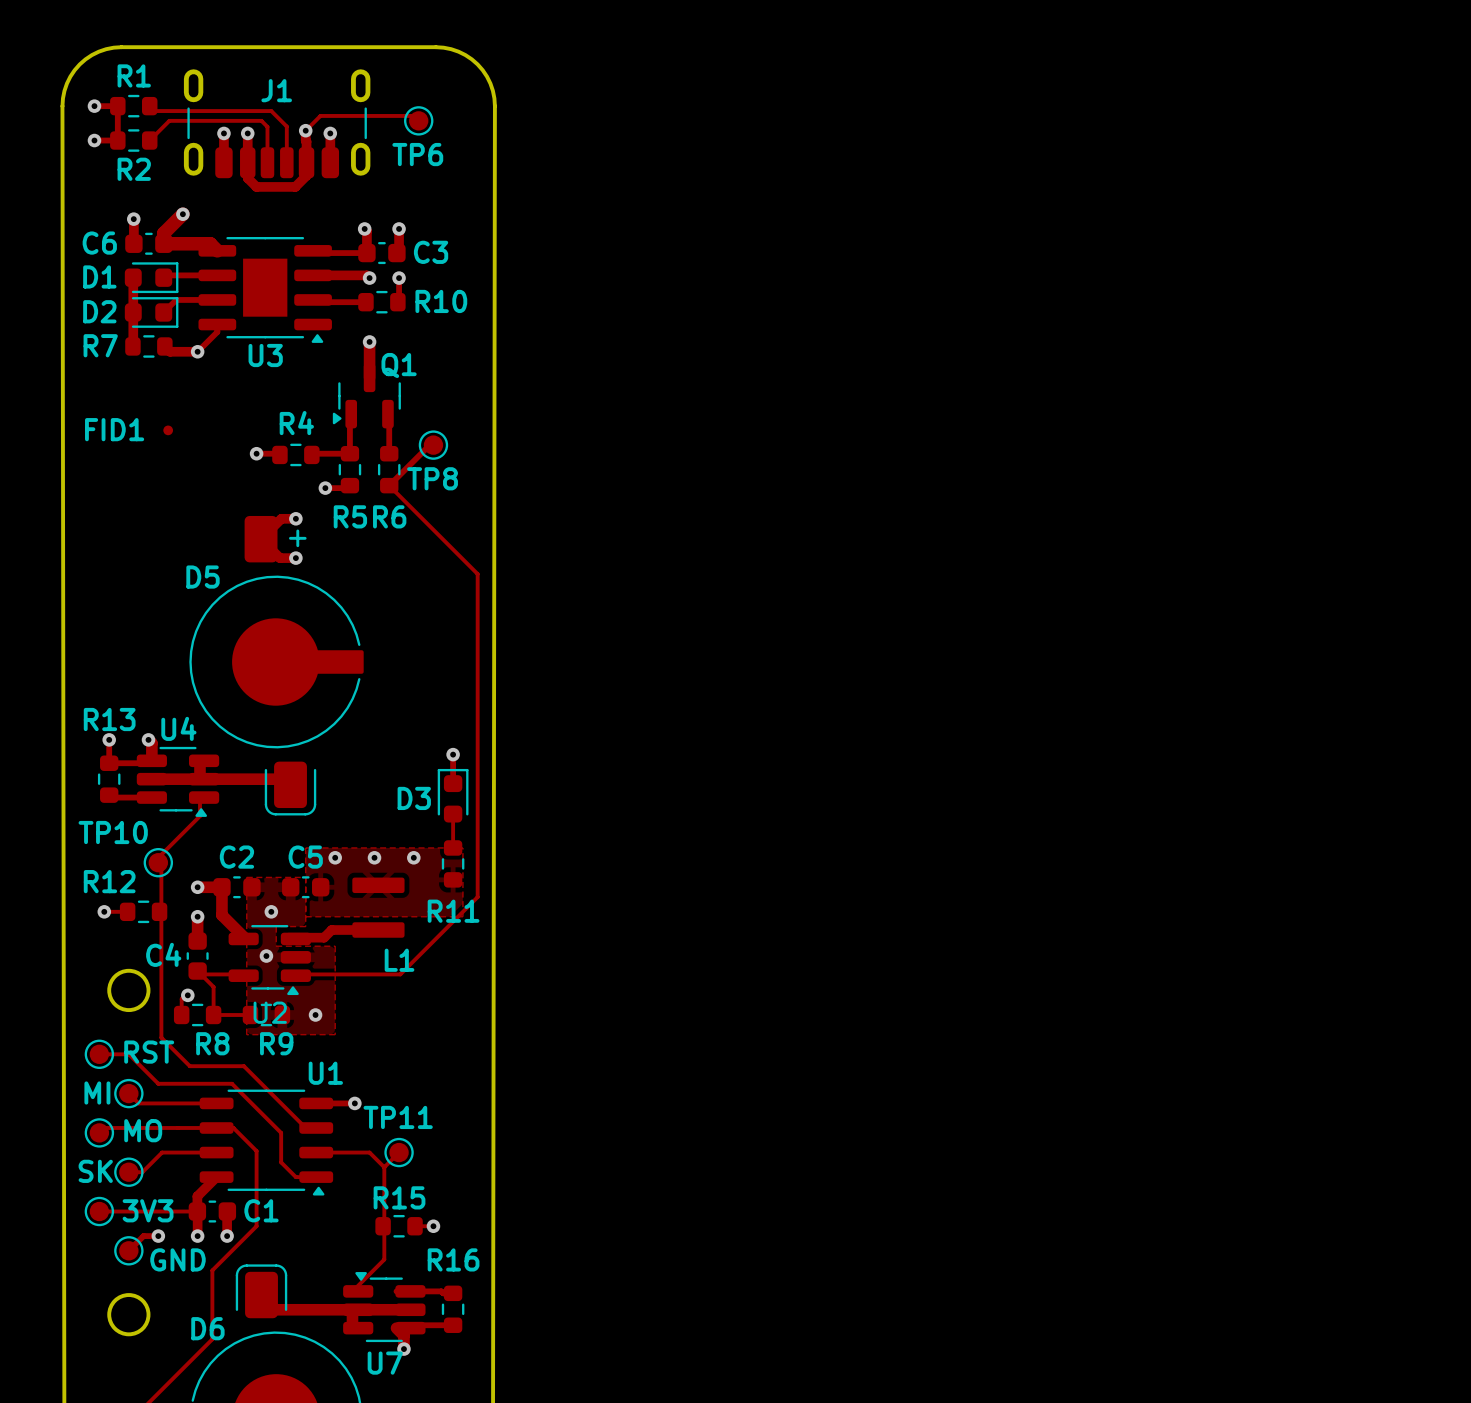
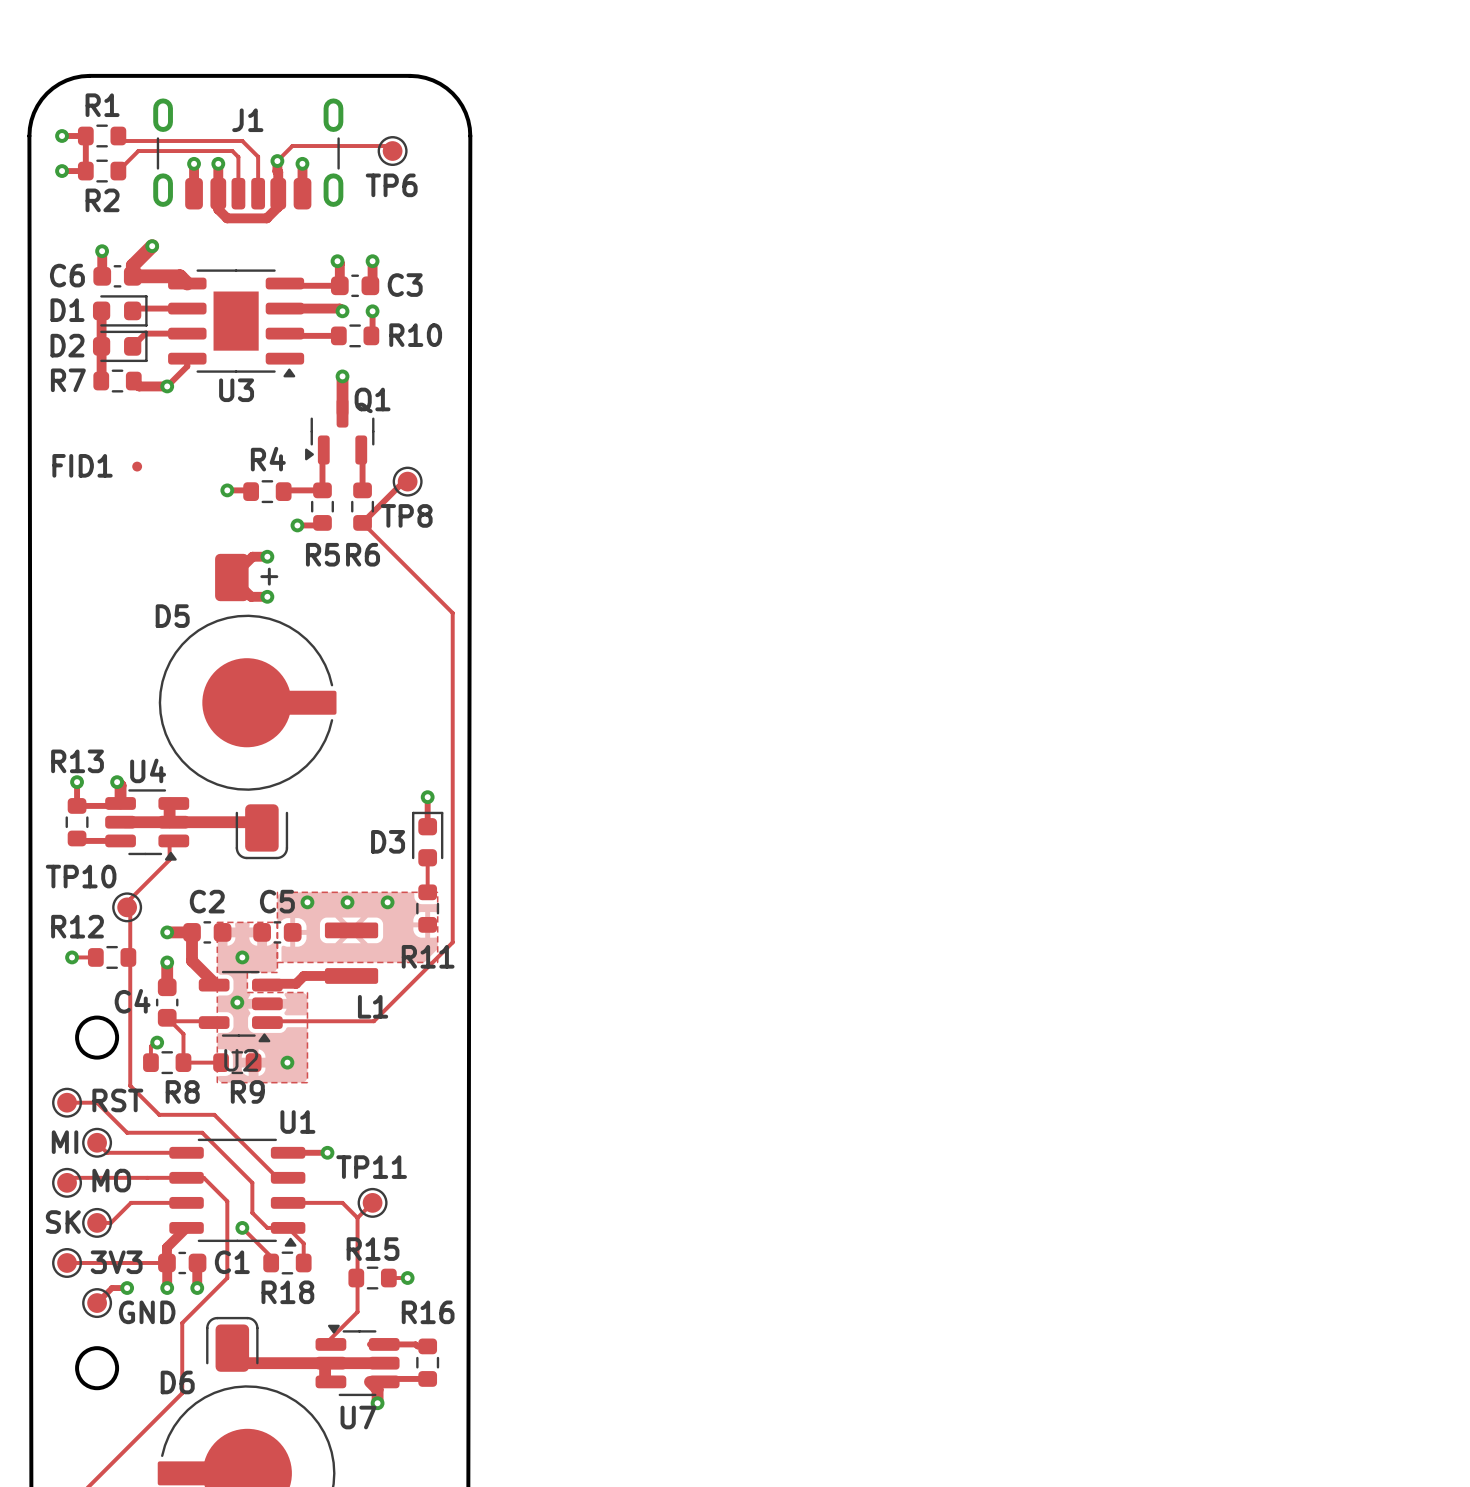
track: none -> (242, 1227) (271, 1256) (271, 1262)
via: none -> (242, 1227)
track: none -> (288, 1227) (303, 1243) (303, 1262)
R18: none -> (287, 1262)

